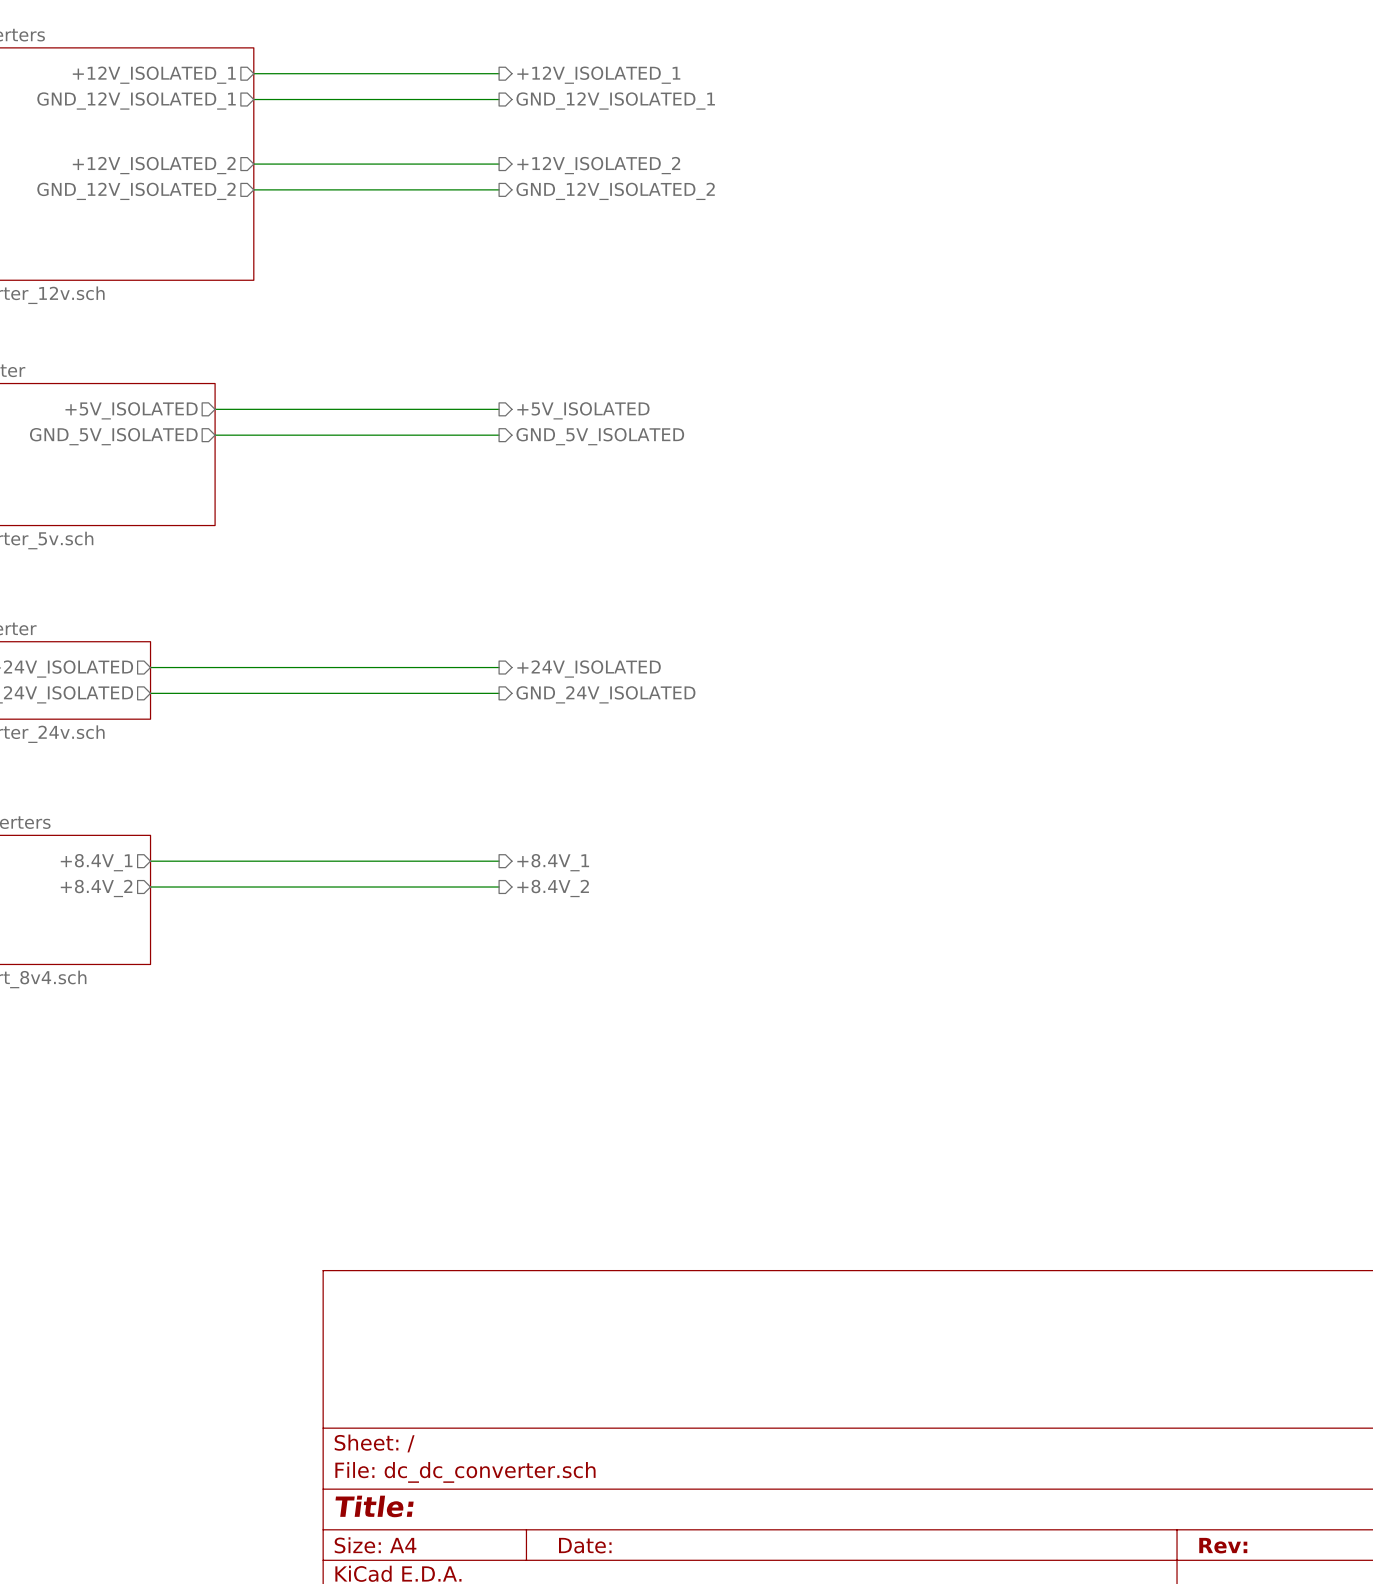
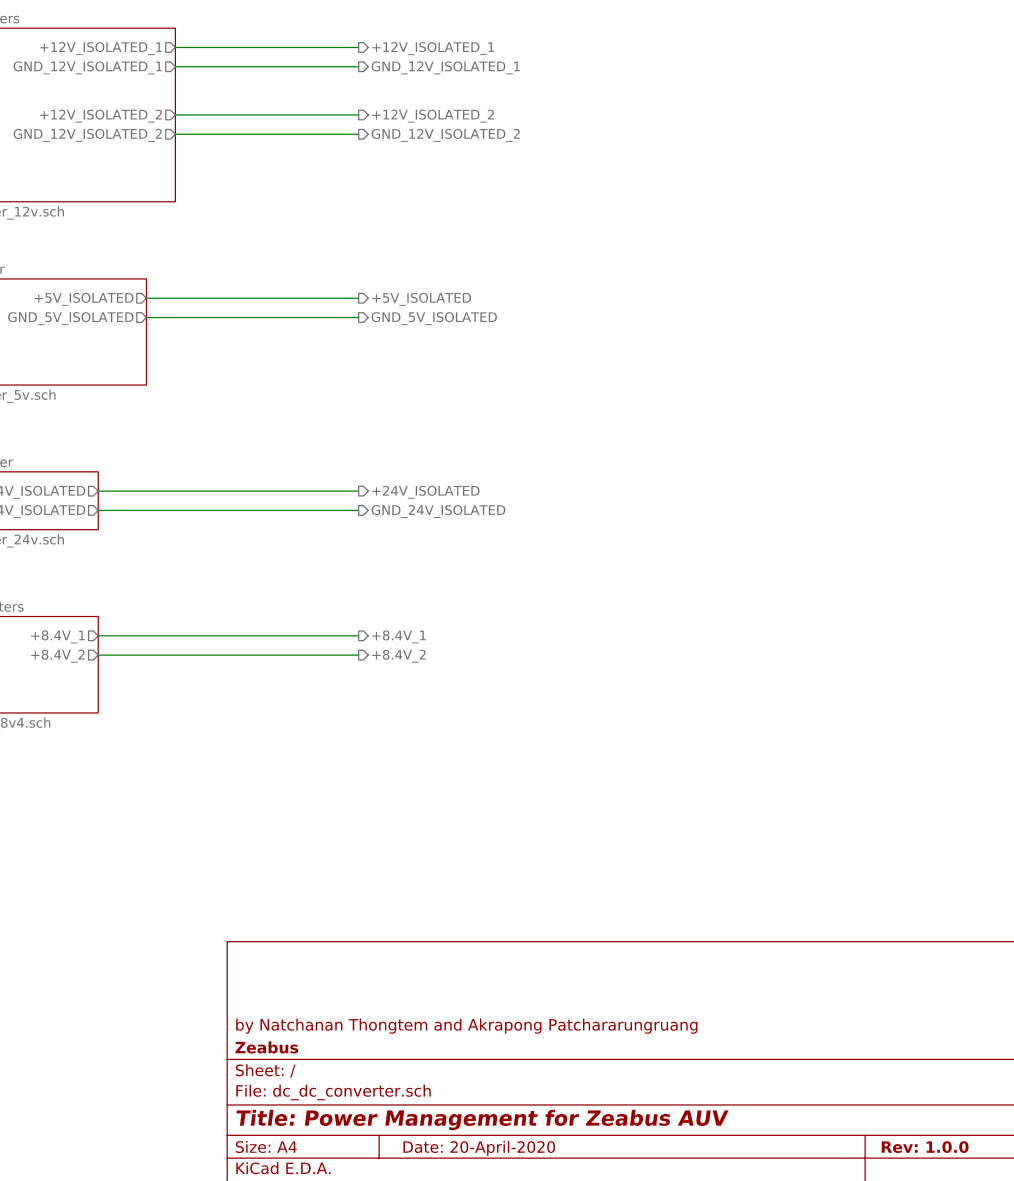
title block: none -> by Natchanan Thongtem and Akrapong Patchararungruang (466, 1026)
title block: none -> Zeabus (266, 1047)
title block: Title: (374, 1506) -> Title: Power Management for Zeabus AUV (482, 1120)
title block: Date: (585, 1545) -> Date: 20-April-2020 (479, 1148)
title block: Rev: (1223, 1545) -> Rev: 1.0.0 (925, 1147)

